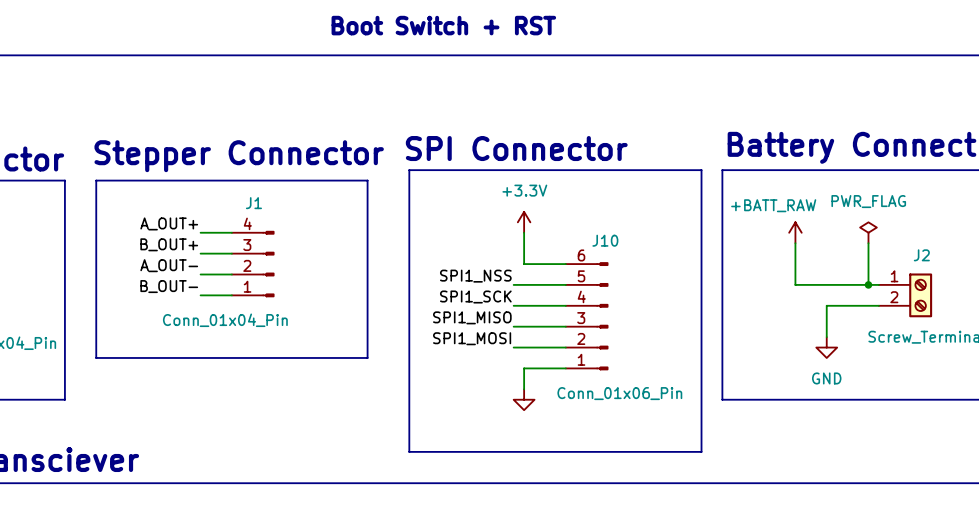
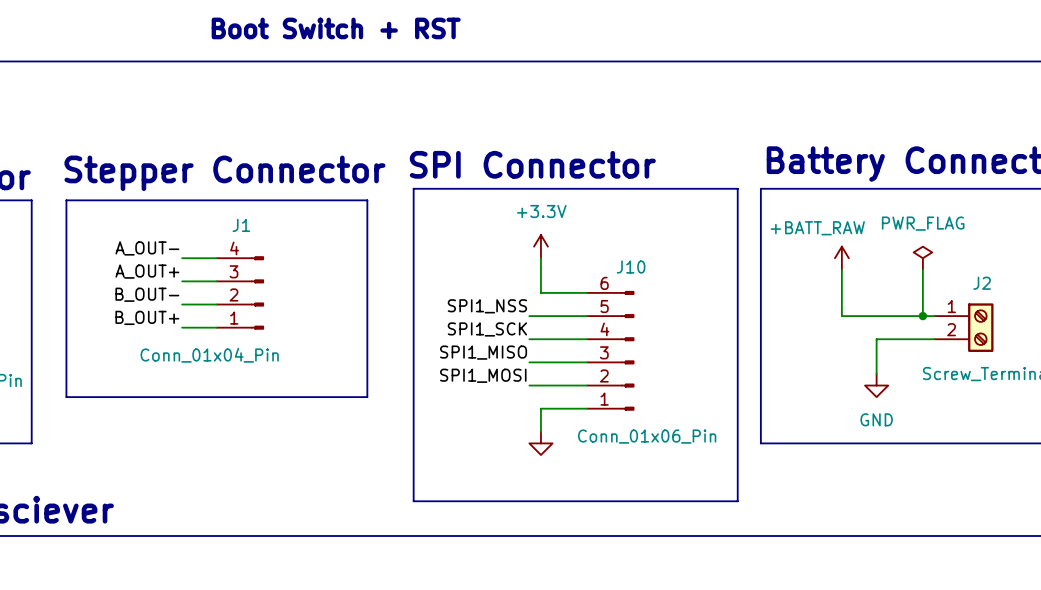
text position: Boot Switch + RST (443, 25) -> Boot Switch + RST (336, 28)
label: A_OUT+ (169, 223) -> A_OUT- (147, 248)
label: B_OUT+ (169, 244) -> A_OUT+ (147, 271)
label: A_OUT- (169, 265) -> B_OUT- (147, 294)
label: B_OUT- (169, 286) -> B_OUT+ (147, 317)

